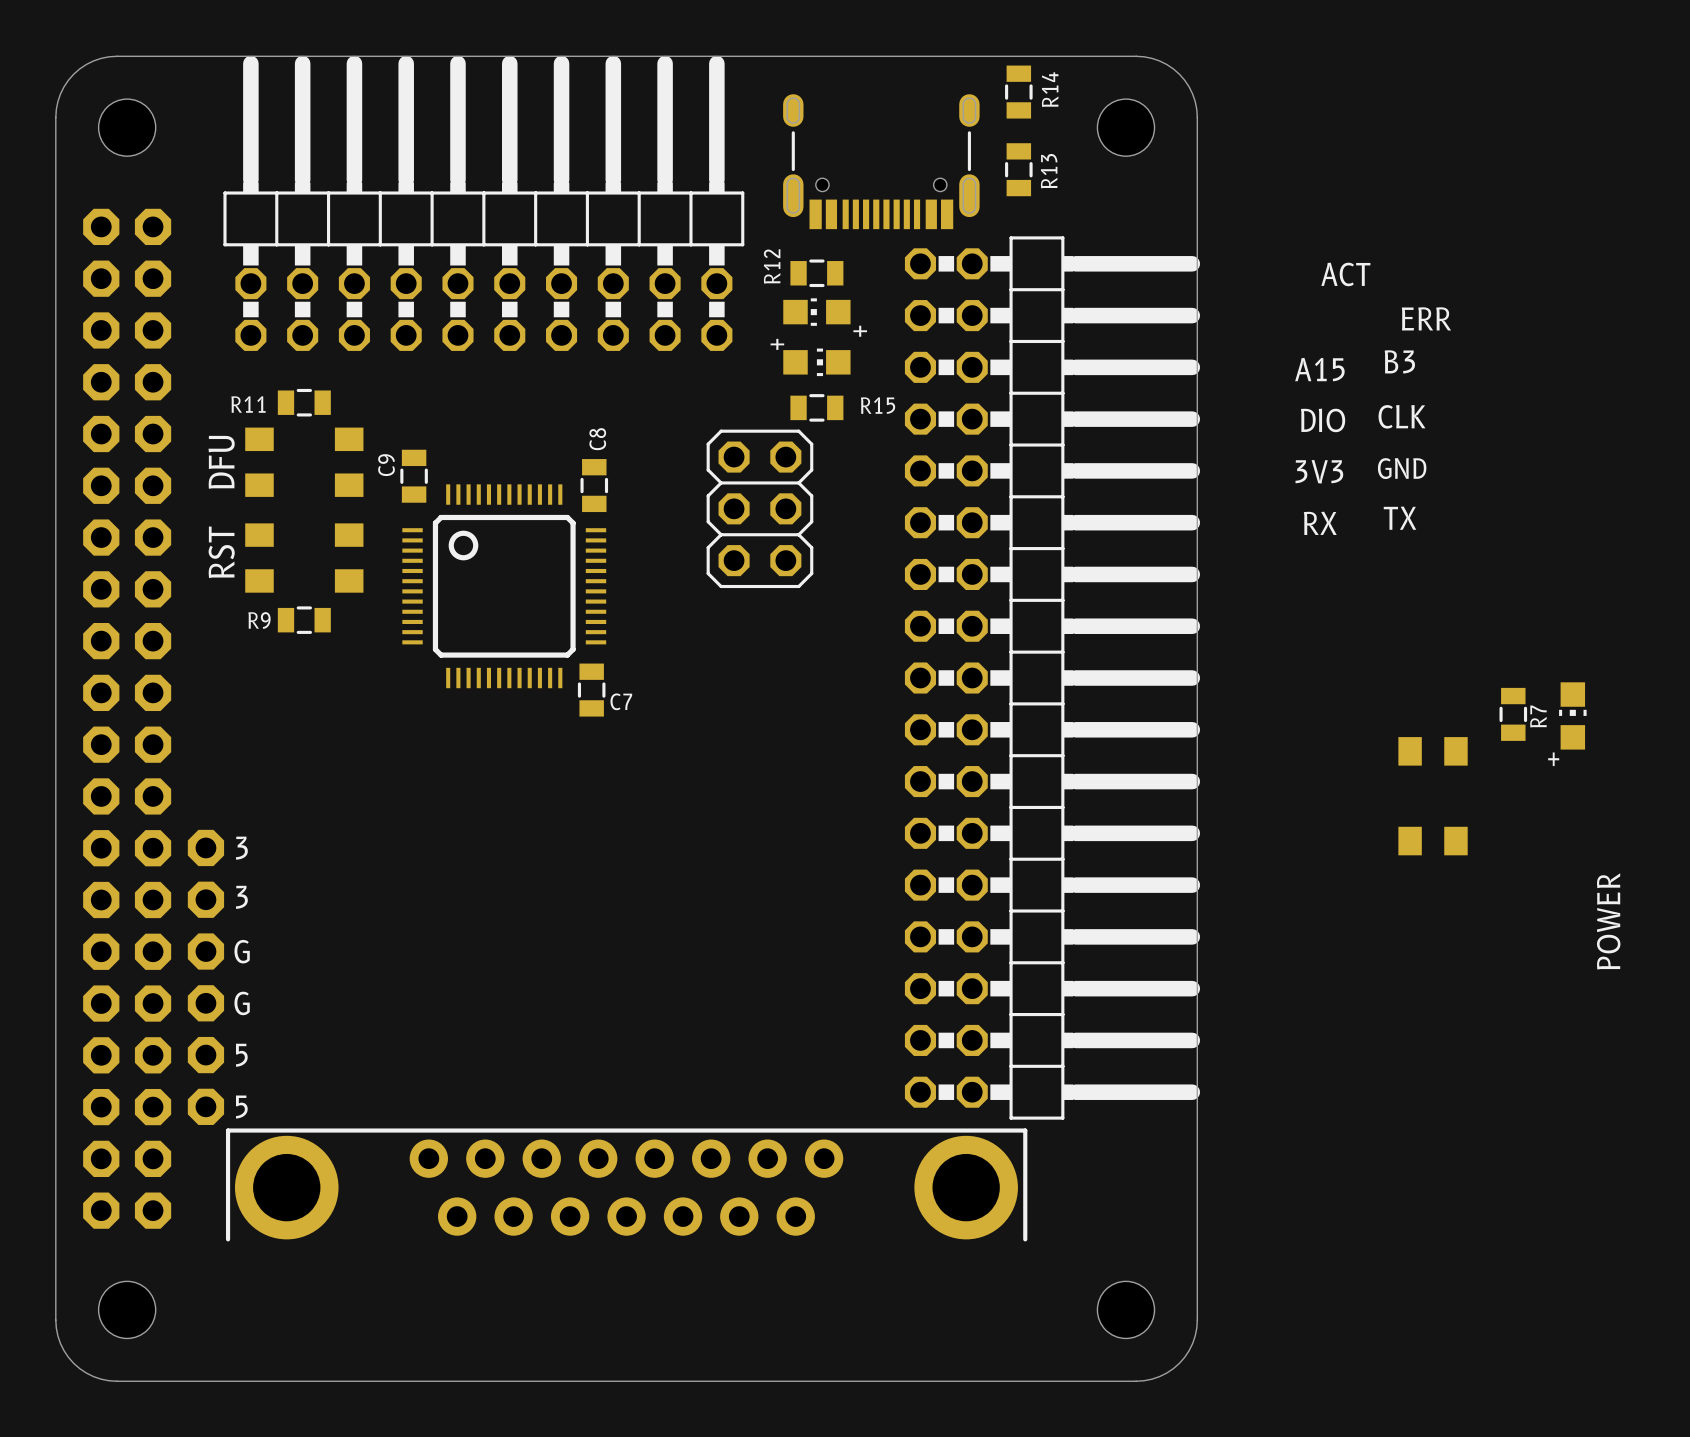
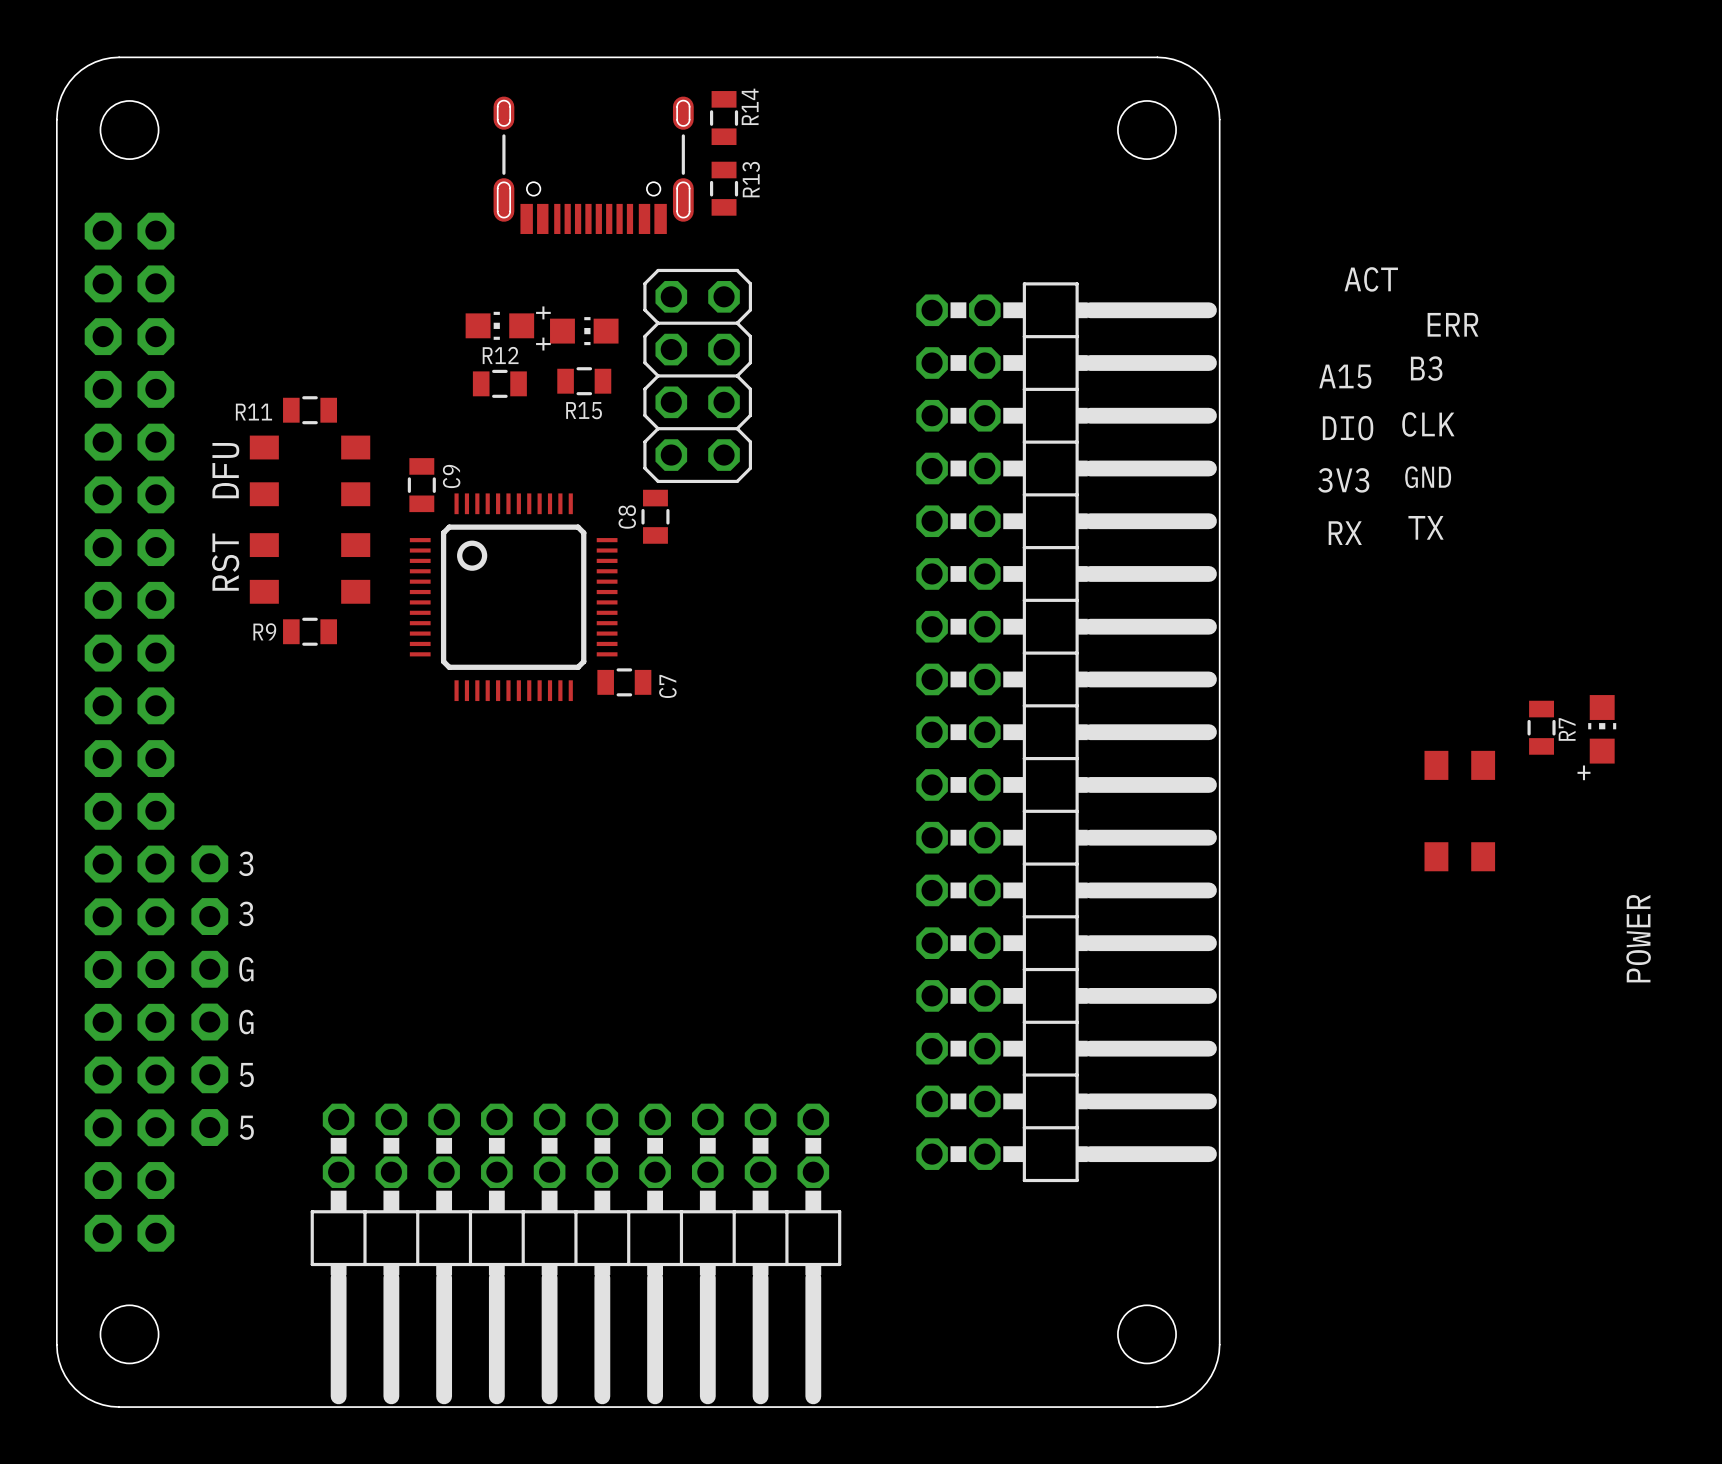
R14 name position: R14 (1050, 89) -> R14 (750, 106)
R14 position: (1018, 92) -> (724, 118)
part position: (881, 161) -> (593, 165)
R13 position: (1018, 169) -> (724, 188)
R13 name position: R13 (1049, 171) -> R13 (751, 179)
part: (483, 203) -> none
R12 name rotation: 0° (772, 266) -> 90° clockwise (500, 355)
R12 position: (816, 273) -> (499, 383)
part position: (816, 312) -> (499, 325)
part position: (816, 362) -> (584, 331)
part: none -> (697, 375)
R15 name position: R15 (878, 405) -> R15 (584, 410)
R15 position: (816, 407) -> (584, 381)
C8 name position: C8 (597, 439) -> C8 (627, 517)
C9 name position: C9 (386, 465) -> C9 (451, 476)
C8 position: (594, 485) -> (655, 516)
part: (759, 508) -> none
part position: (1052, 678) -> (1066, 732)
C7 rotation: 0° (591, 690) -> 90° clockwise (624, 682)
part: (626, 1184) -> none
part: none -> (575, 1253)

